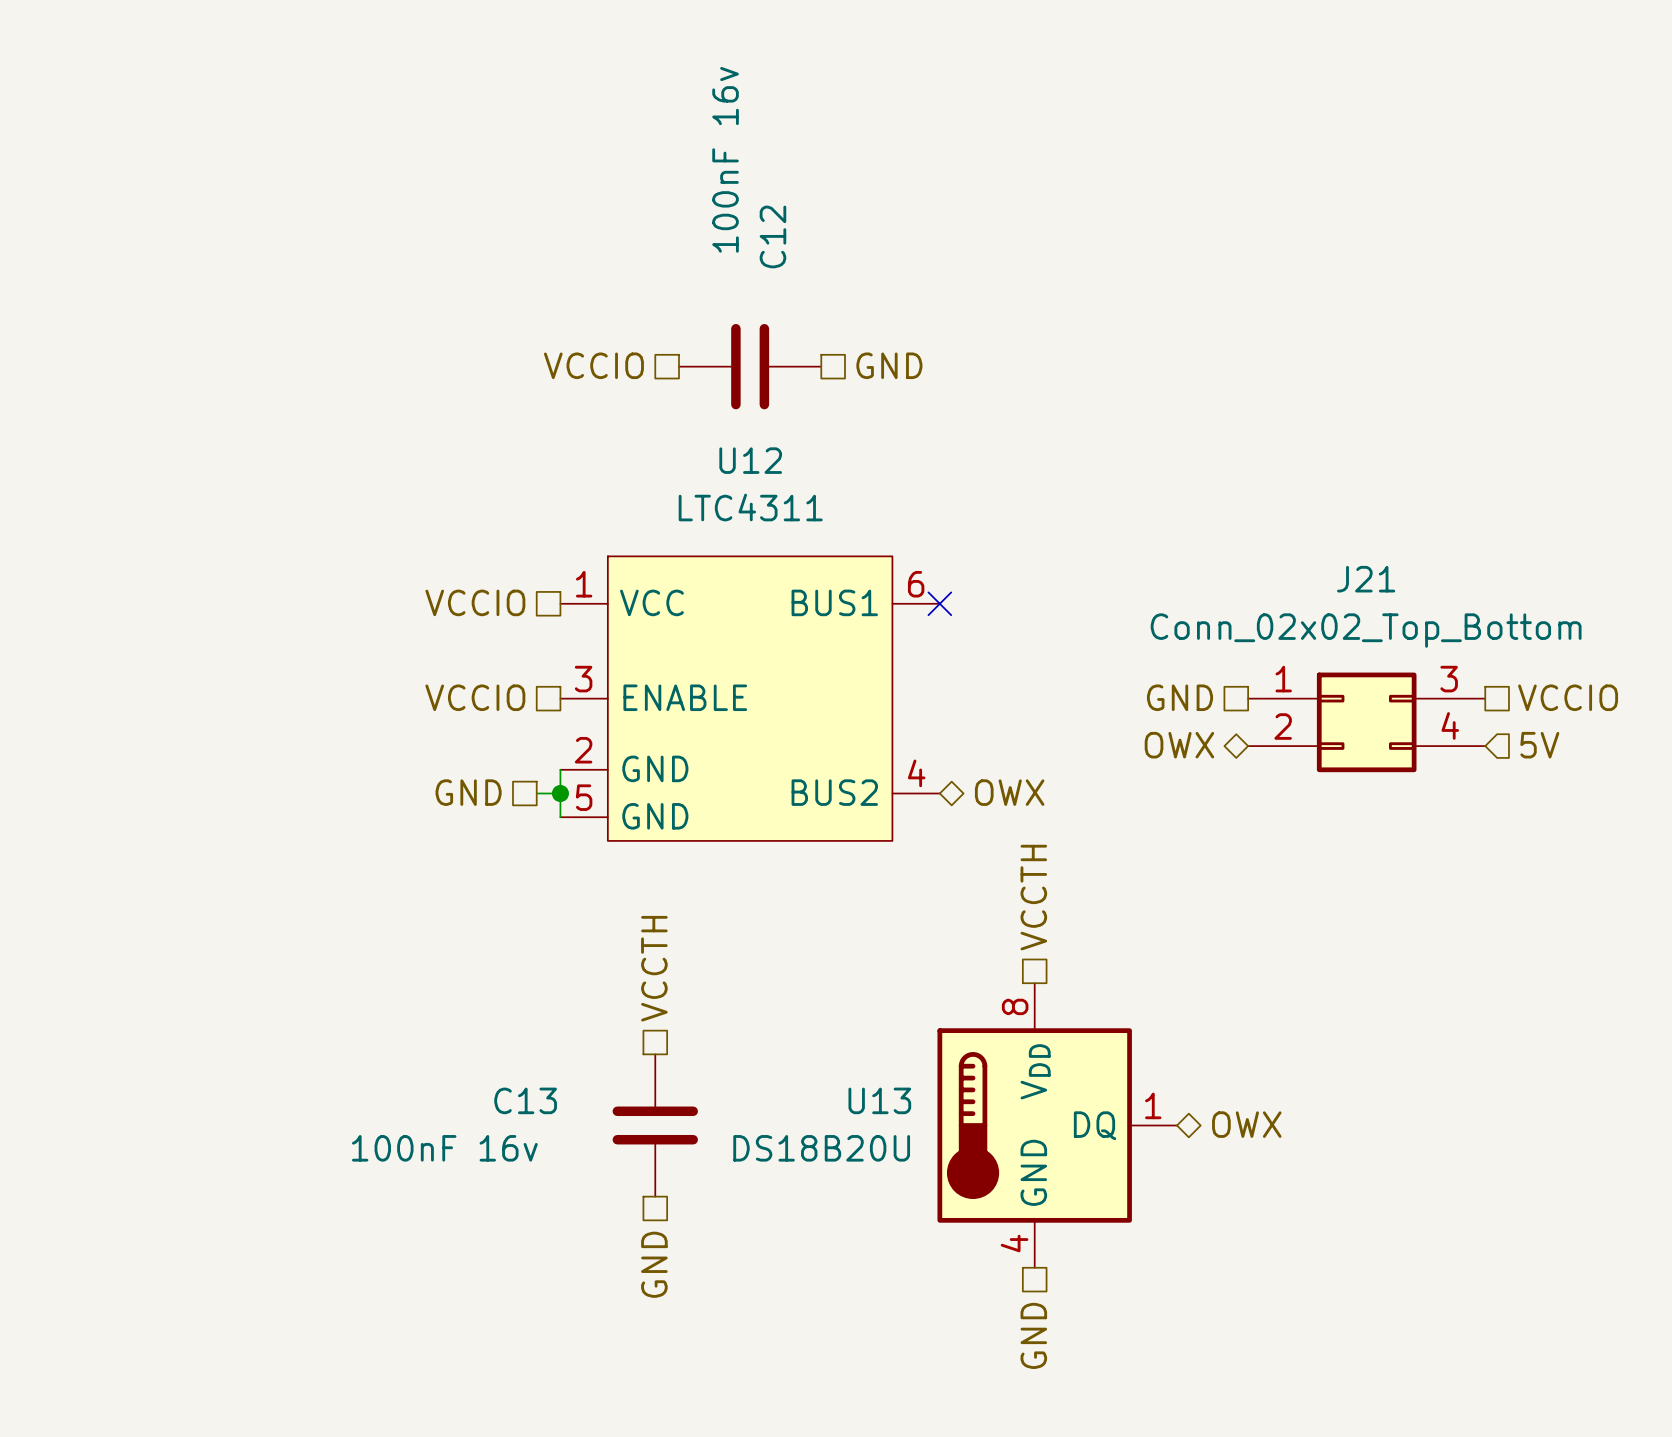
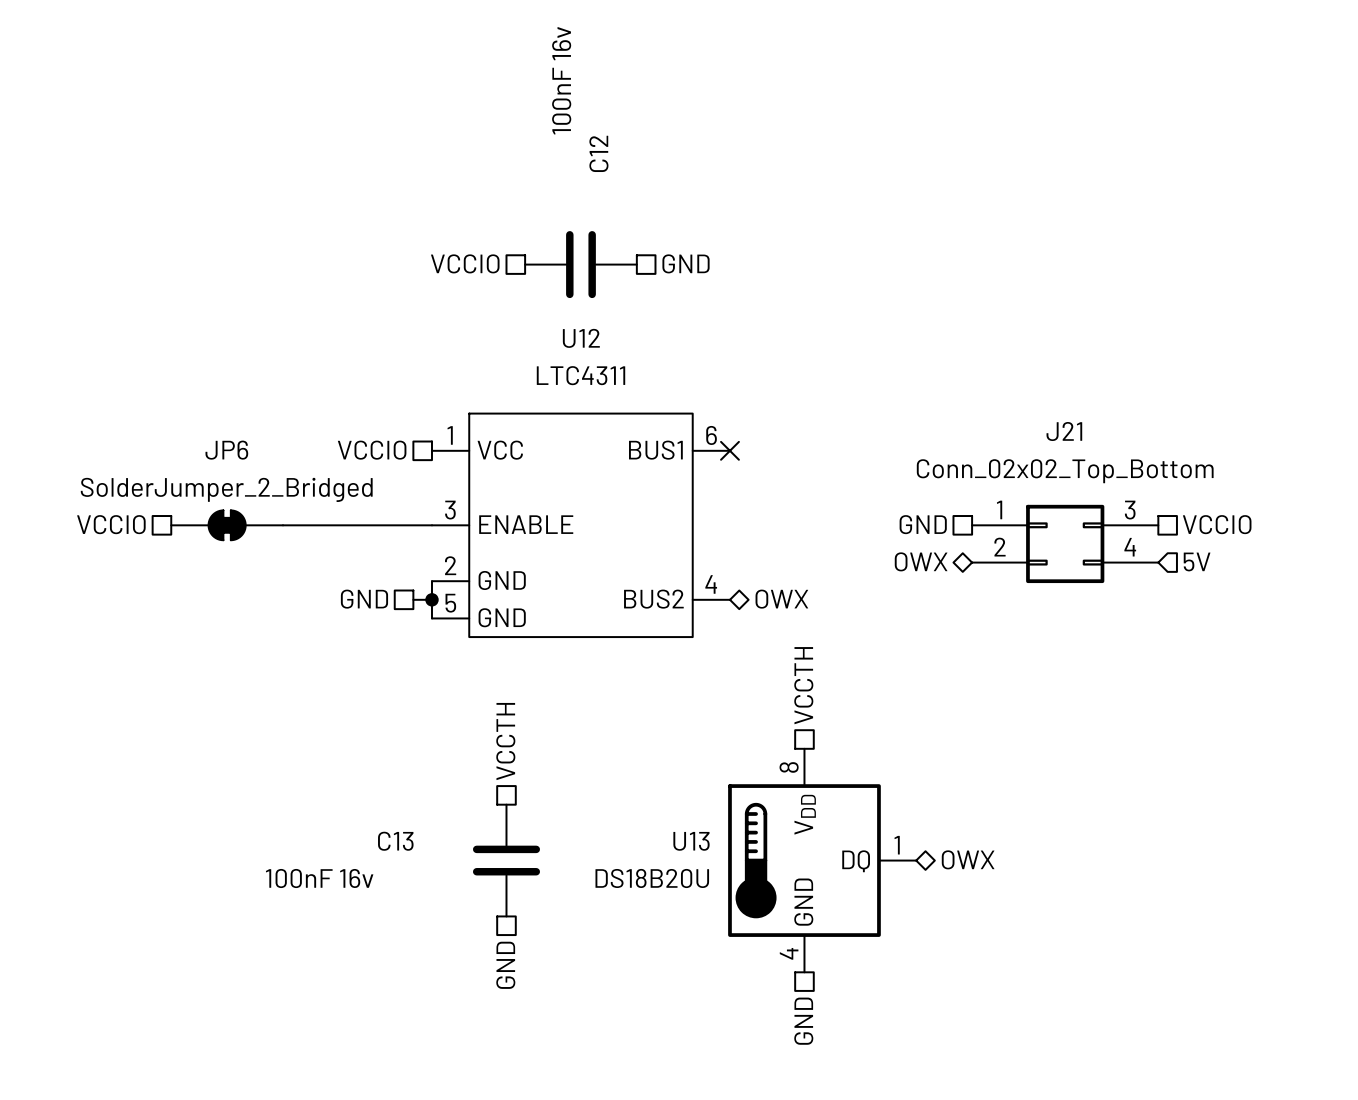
hierarchical label position: VCCIO (475, 697) -> VCCIO (111, 524)
JP6: none -> SolderJumper_2_Bridged (227, 525)
wire: none -> (282, 525) (431, 525)

